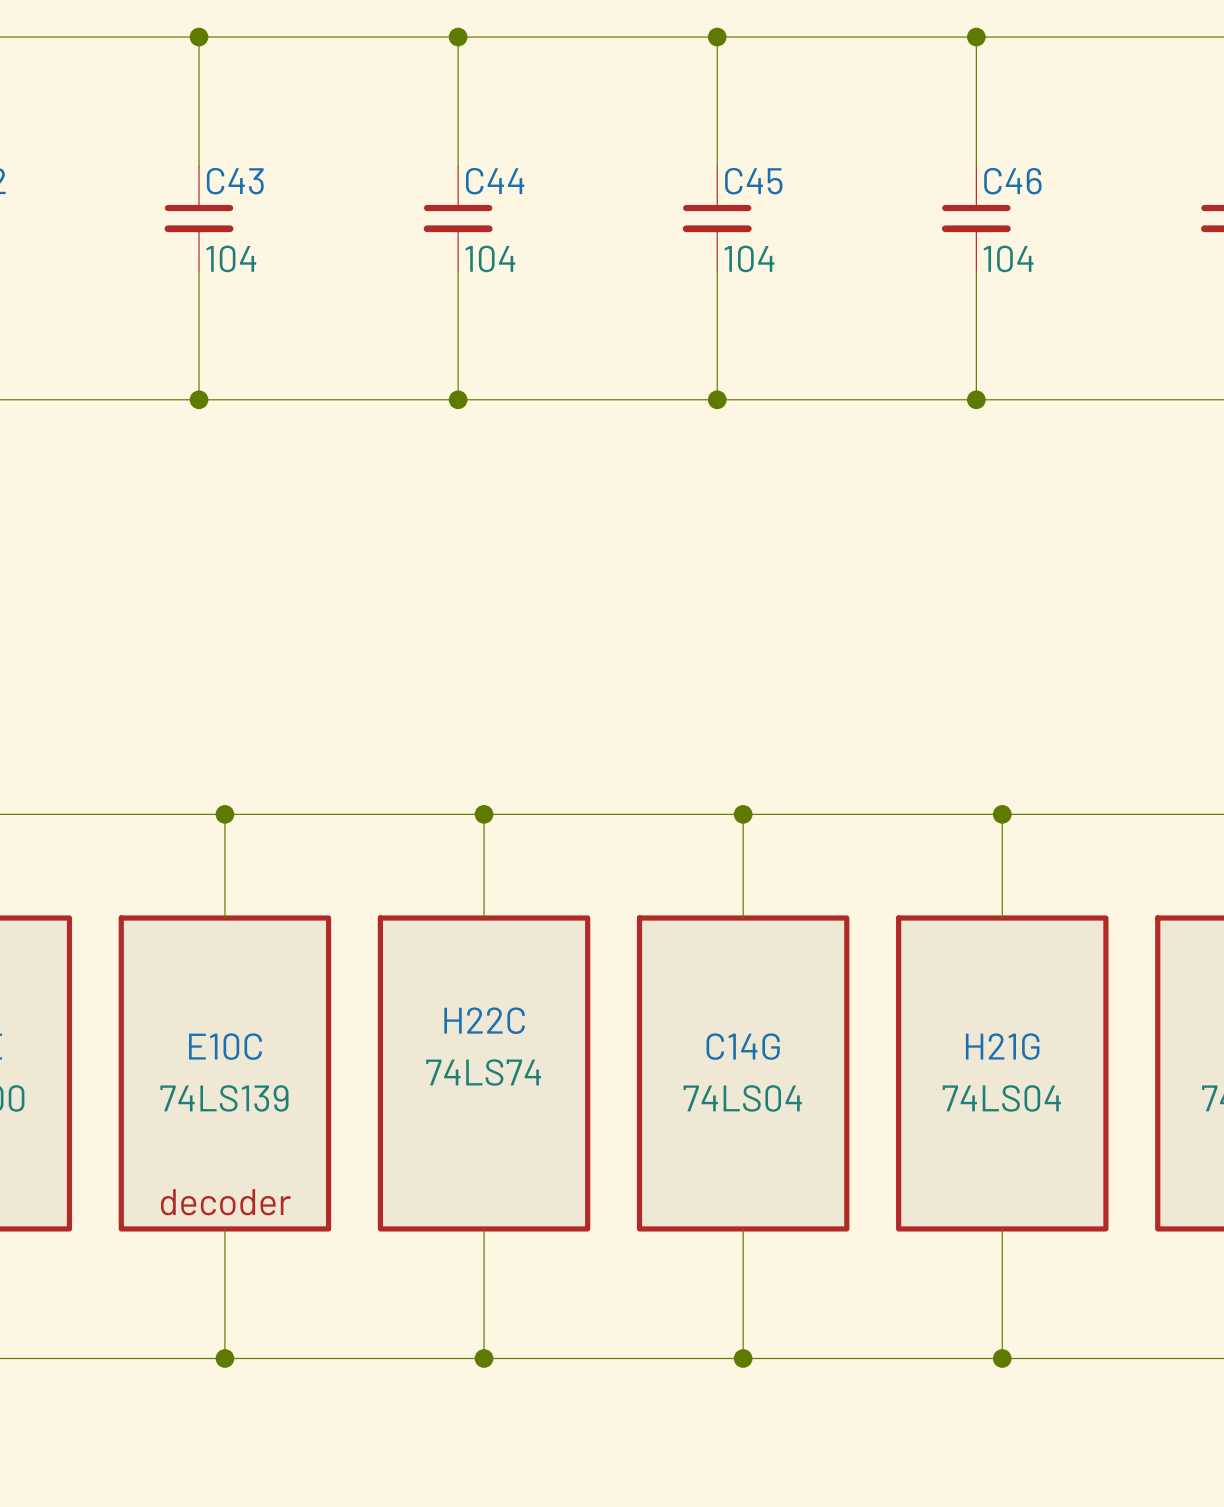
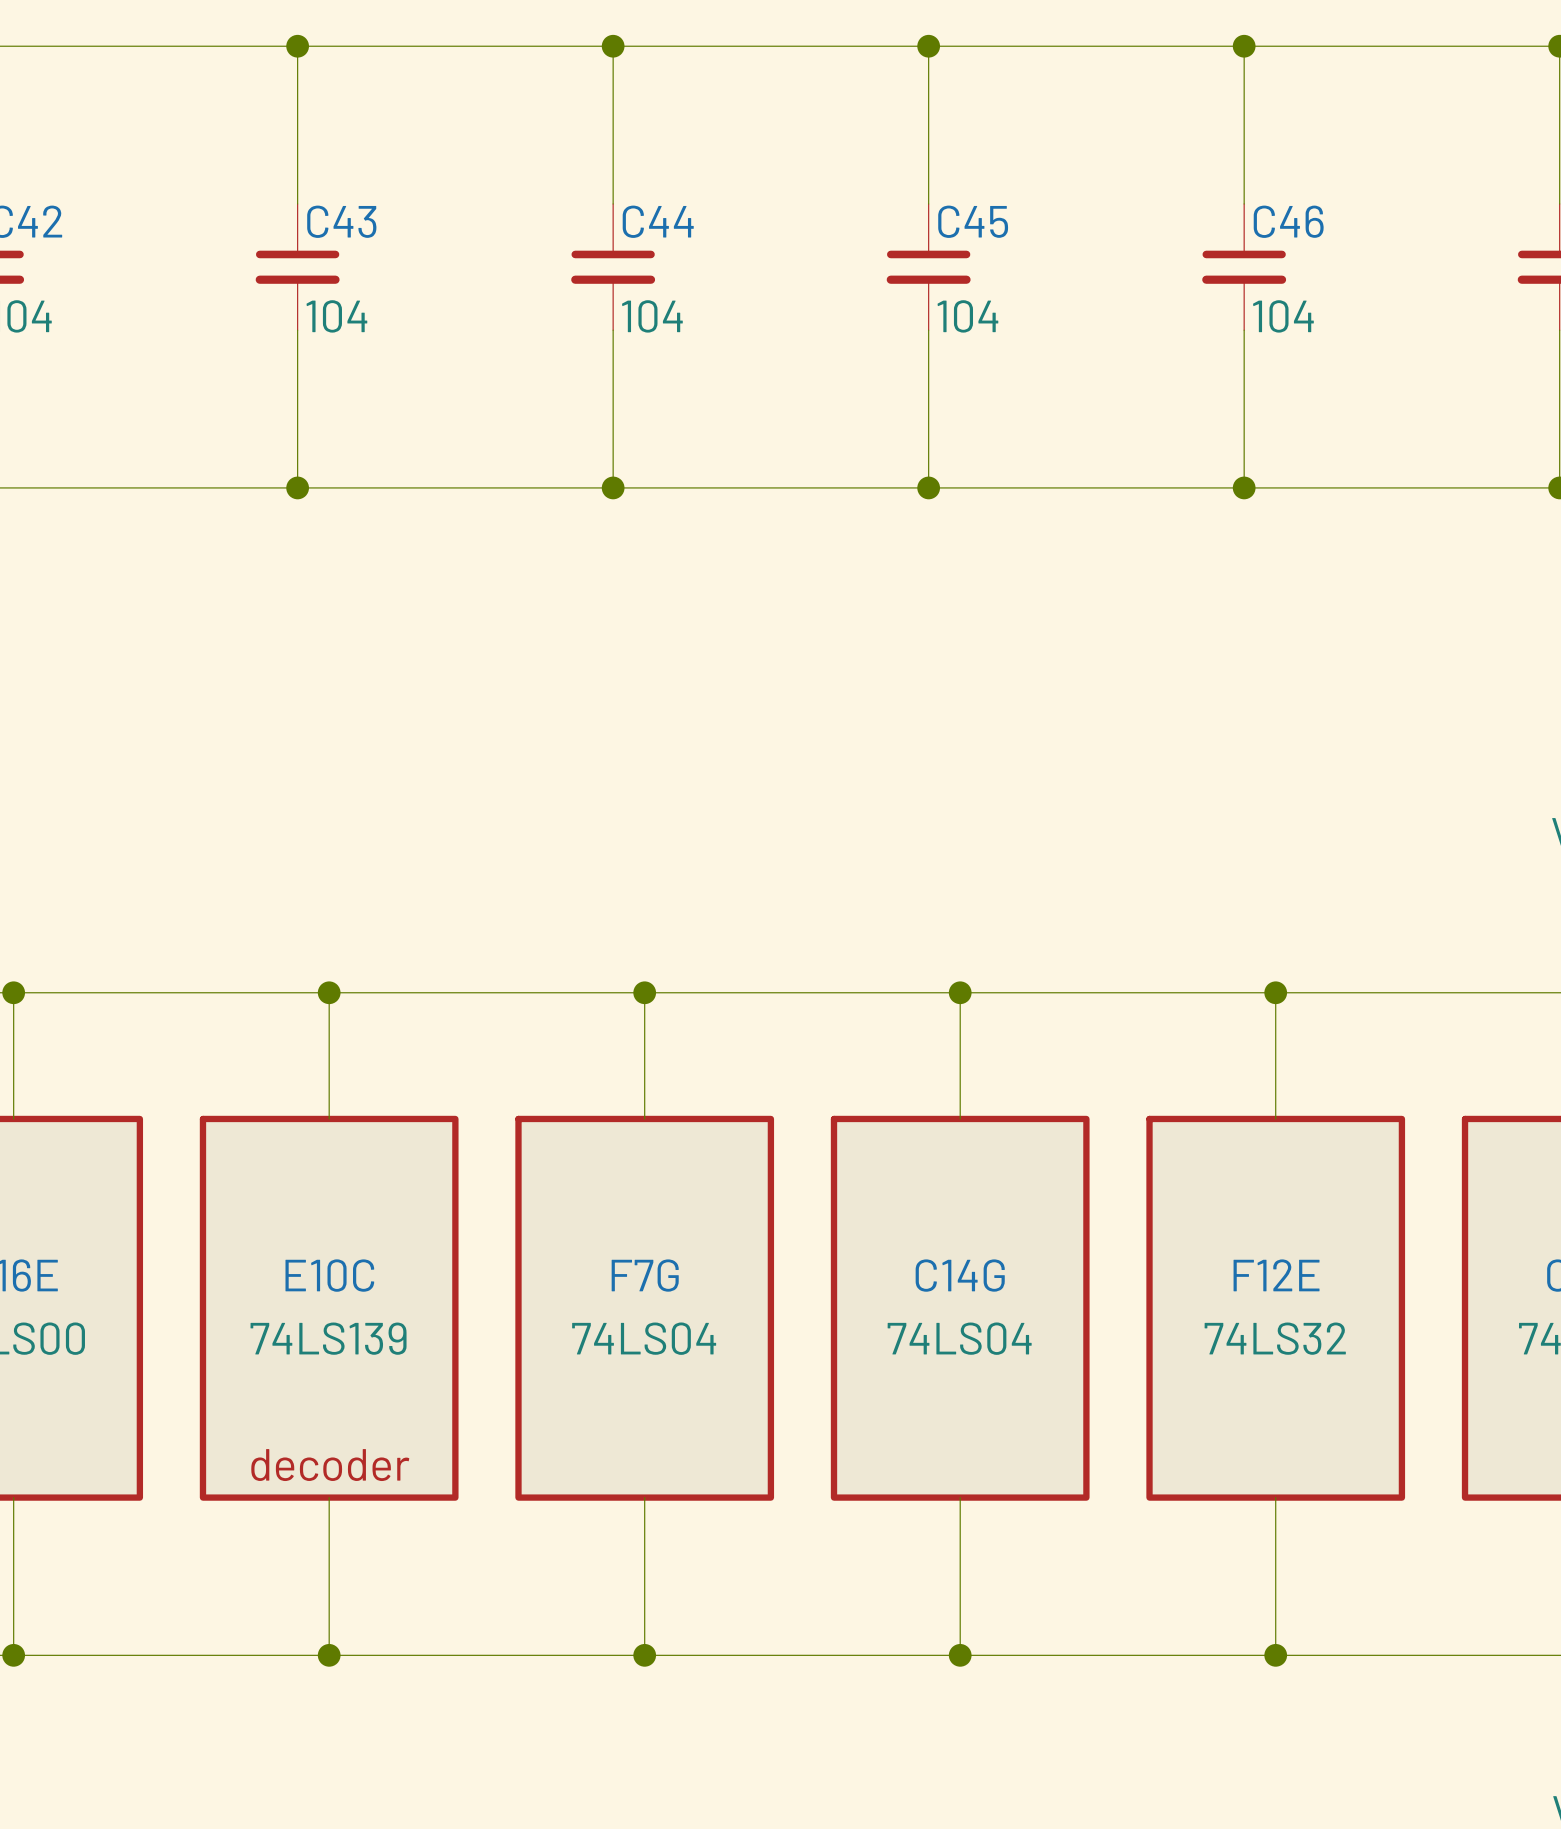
H22C name: H22C (484, 1020) -> F7G (645, 1275)
H21G name: H21G (1002, 1046) -> F12E (1276, 1275)
H22C value: 74LS74 (483, 1072) -> 74LS04 (644, 1338)
H21G value: 74LS04 (1001, 1098) -> 74LS32 (1275, 1338)

